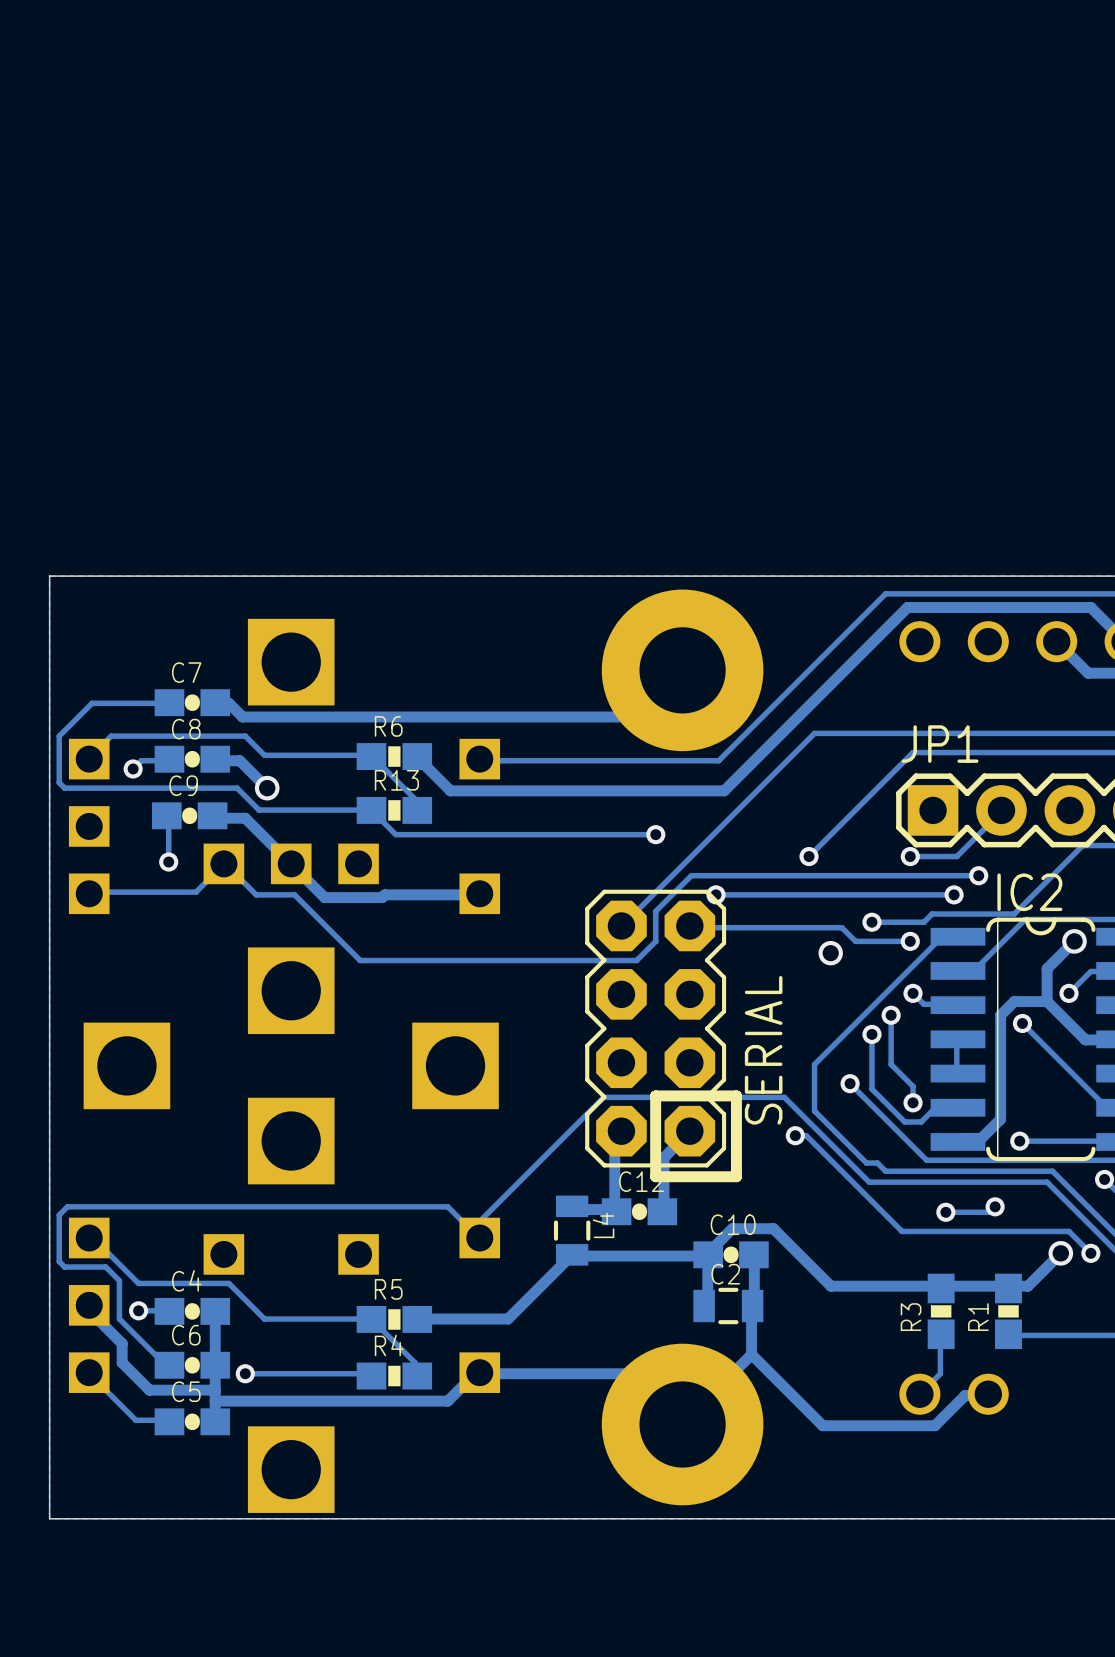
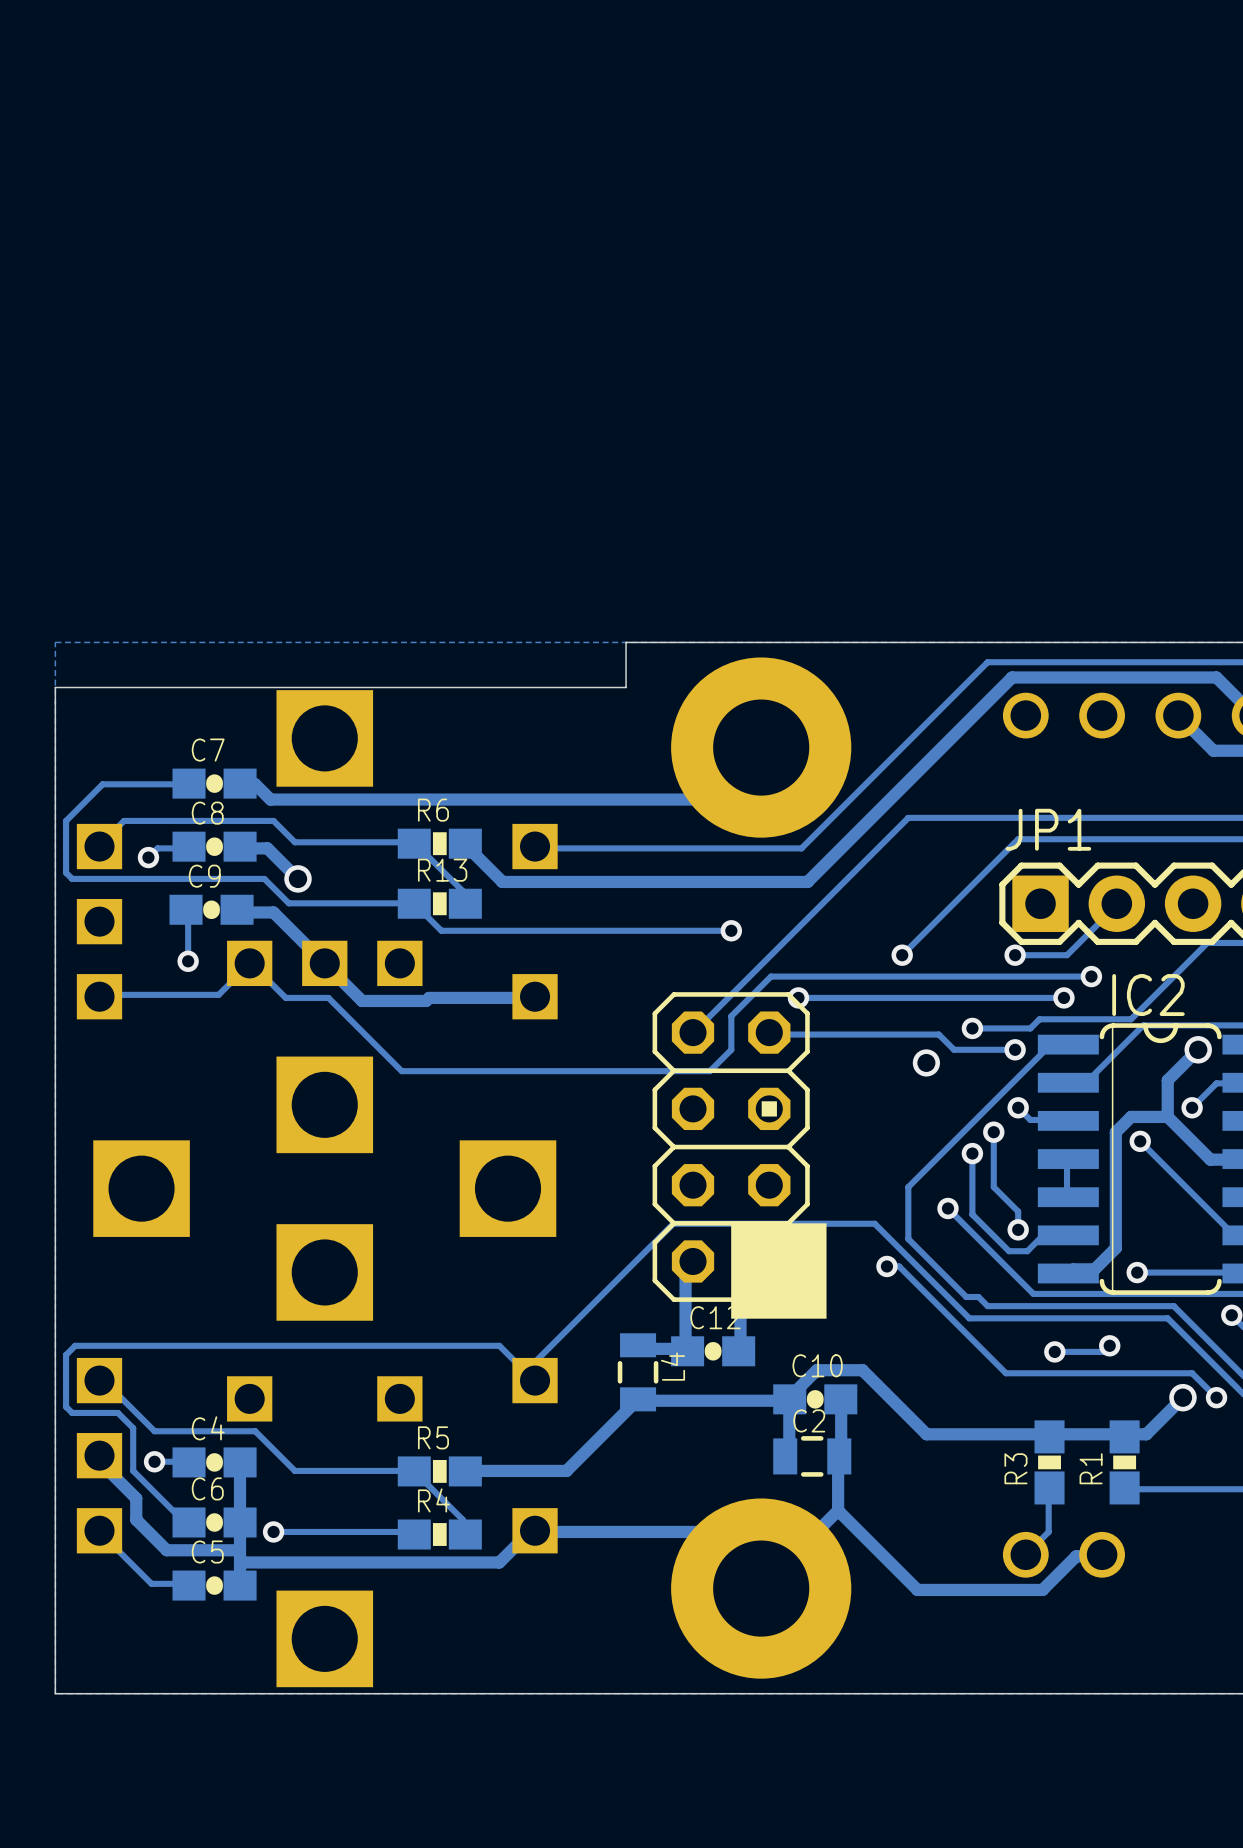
board edge: (561, 576) (49, 576) (49, 616) -> (626, 642) (626, 687) (55, 687)
SERIAL: (655, 1028) -> none
part: none -> (739, 1155)
line: (736, 1095) (736, 1176) (655, 1176) (655, 1095) (736, 1095) -> none

